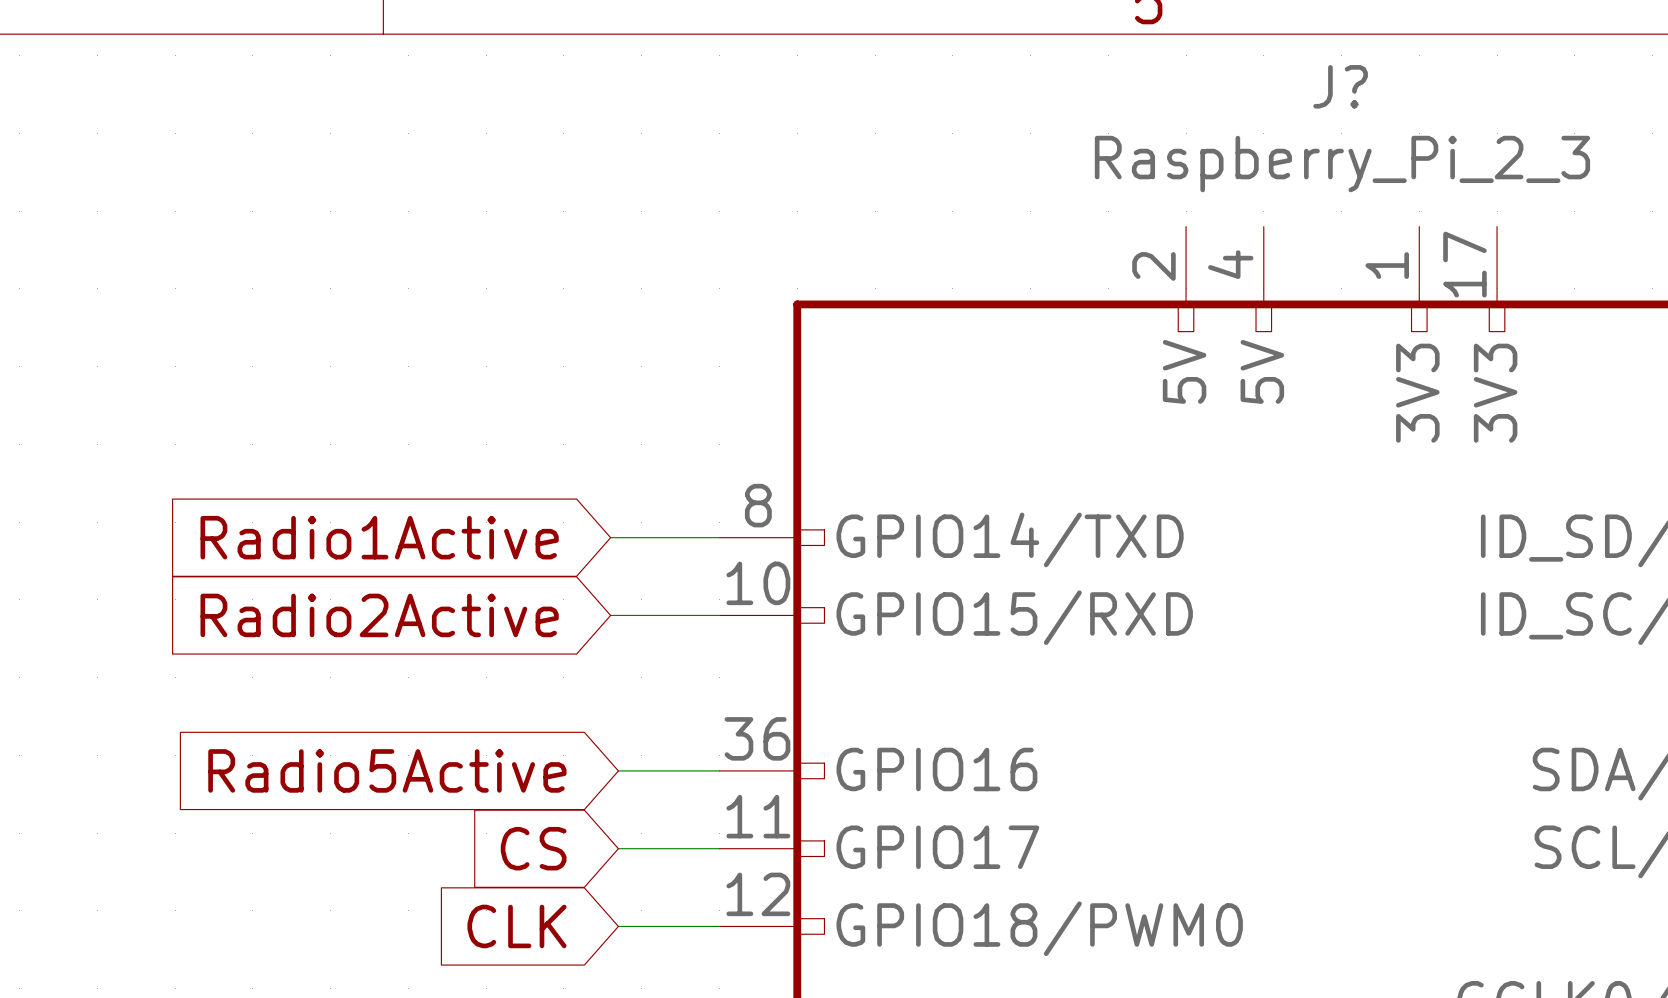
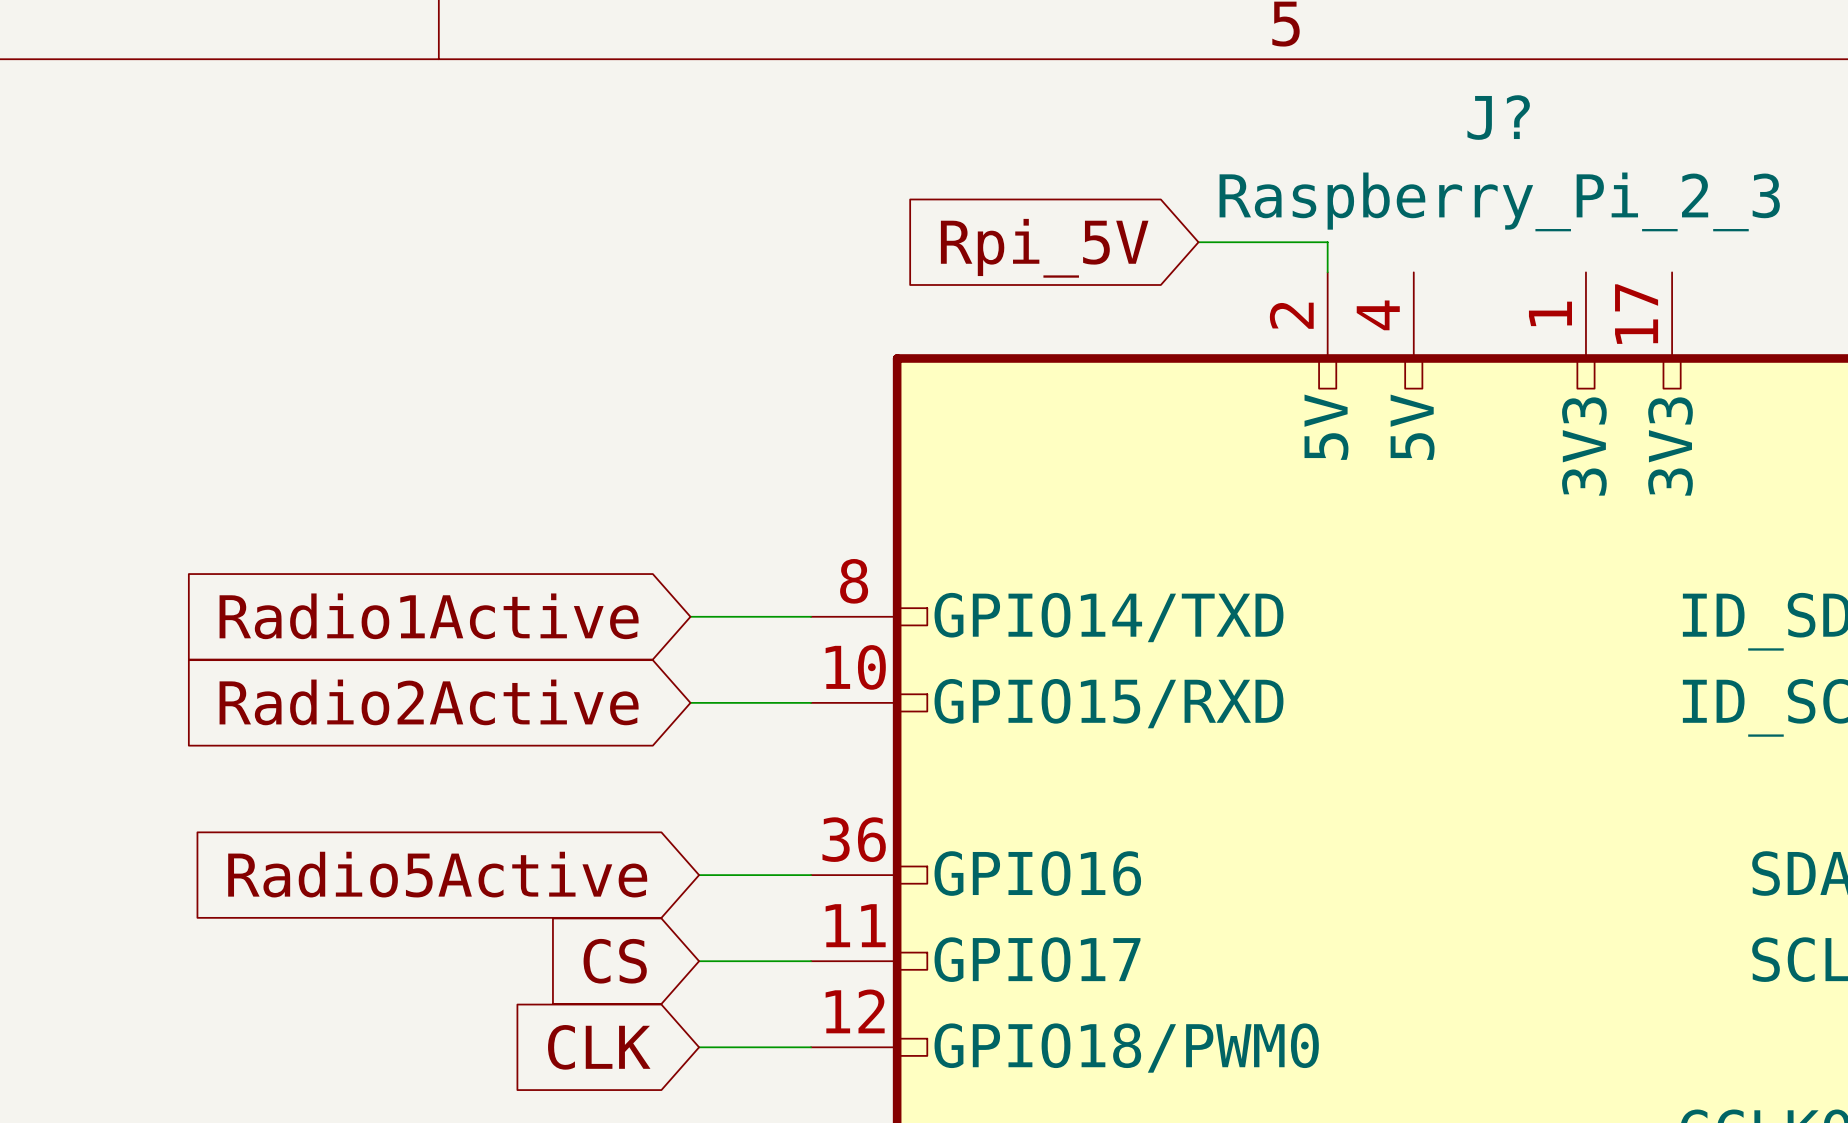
wire: none -> (1198, 242) (1327, 242) (1327, 272)
global label: none -> Rpi_5V (1044, 248)

